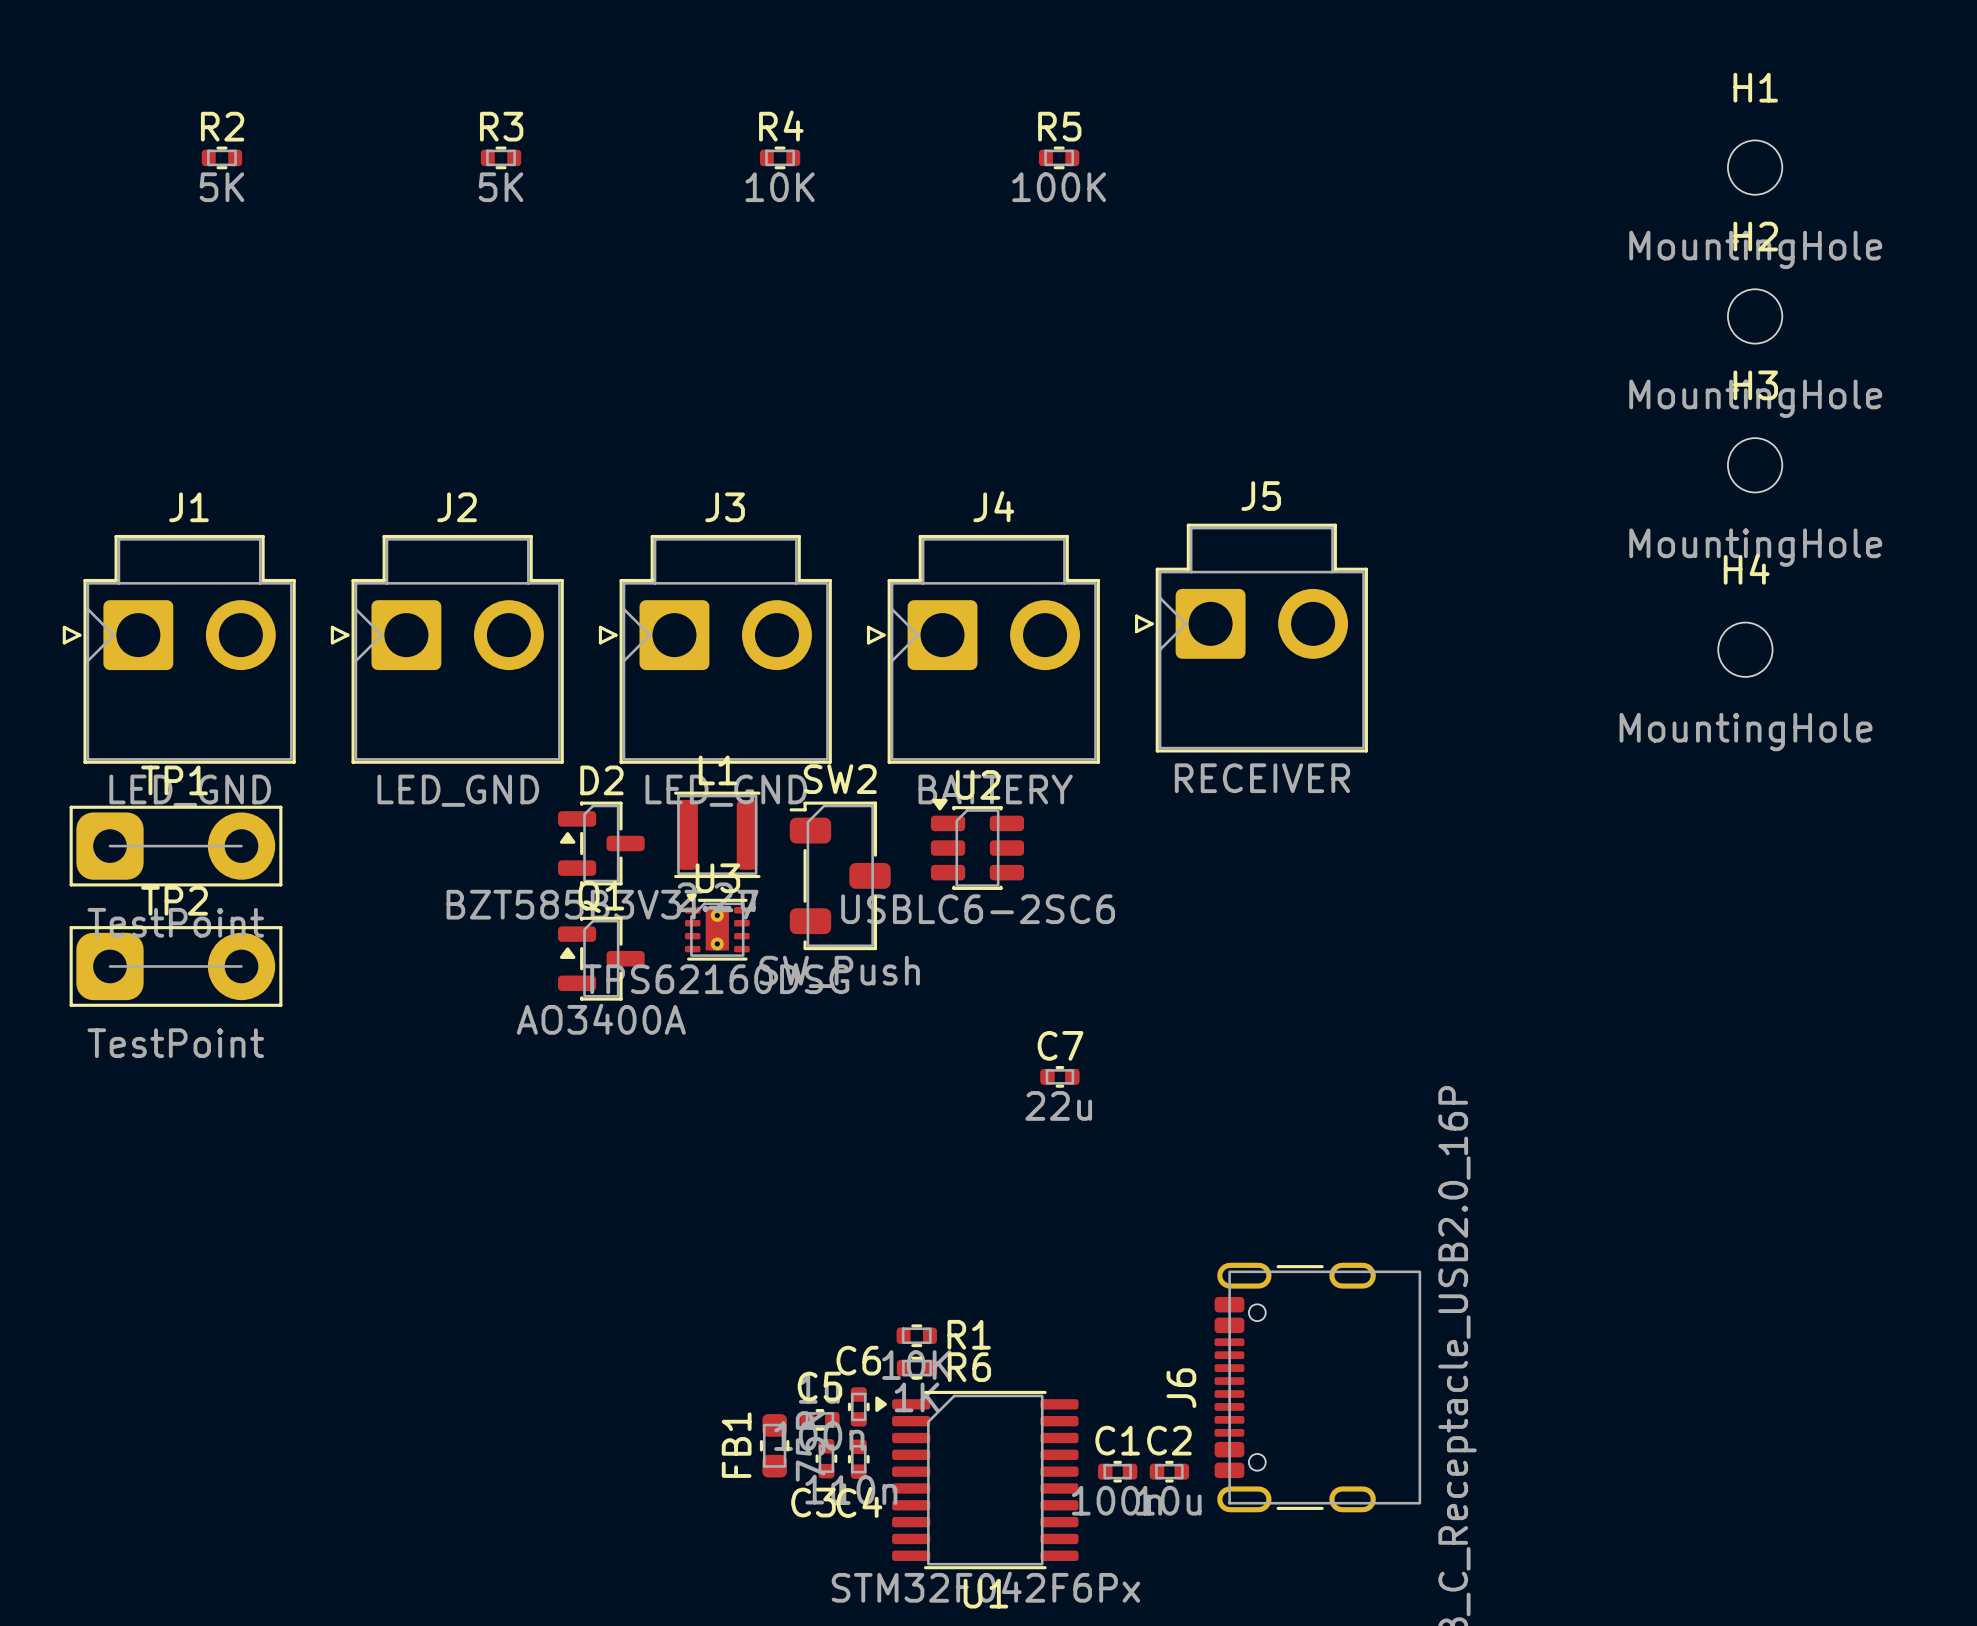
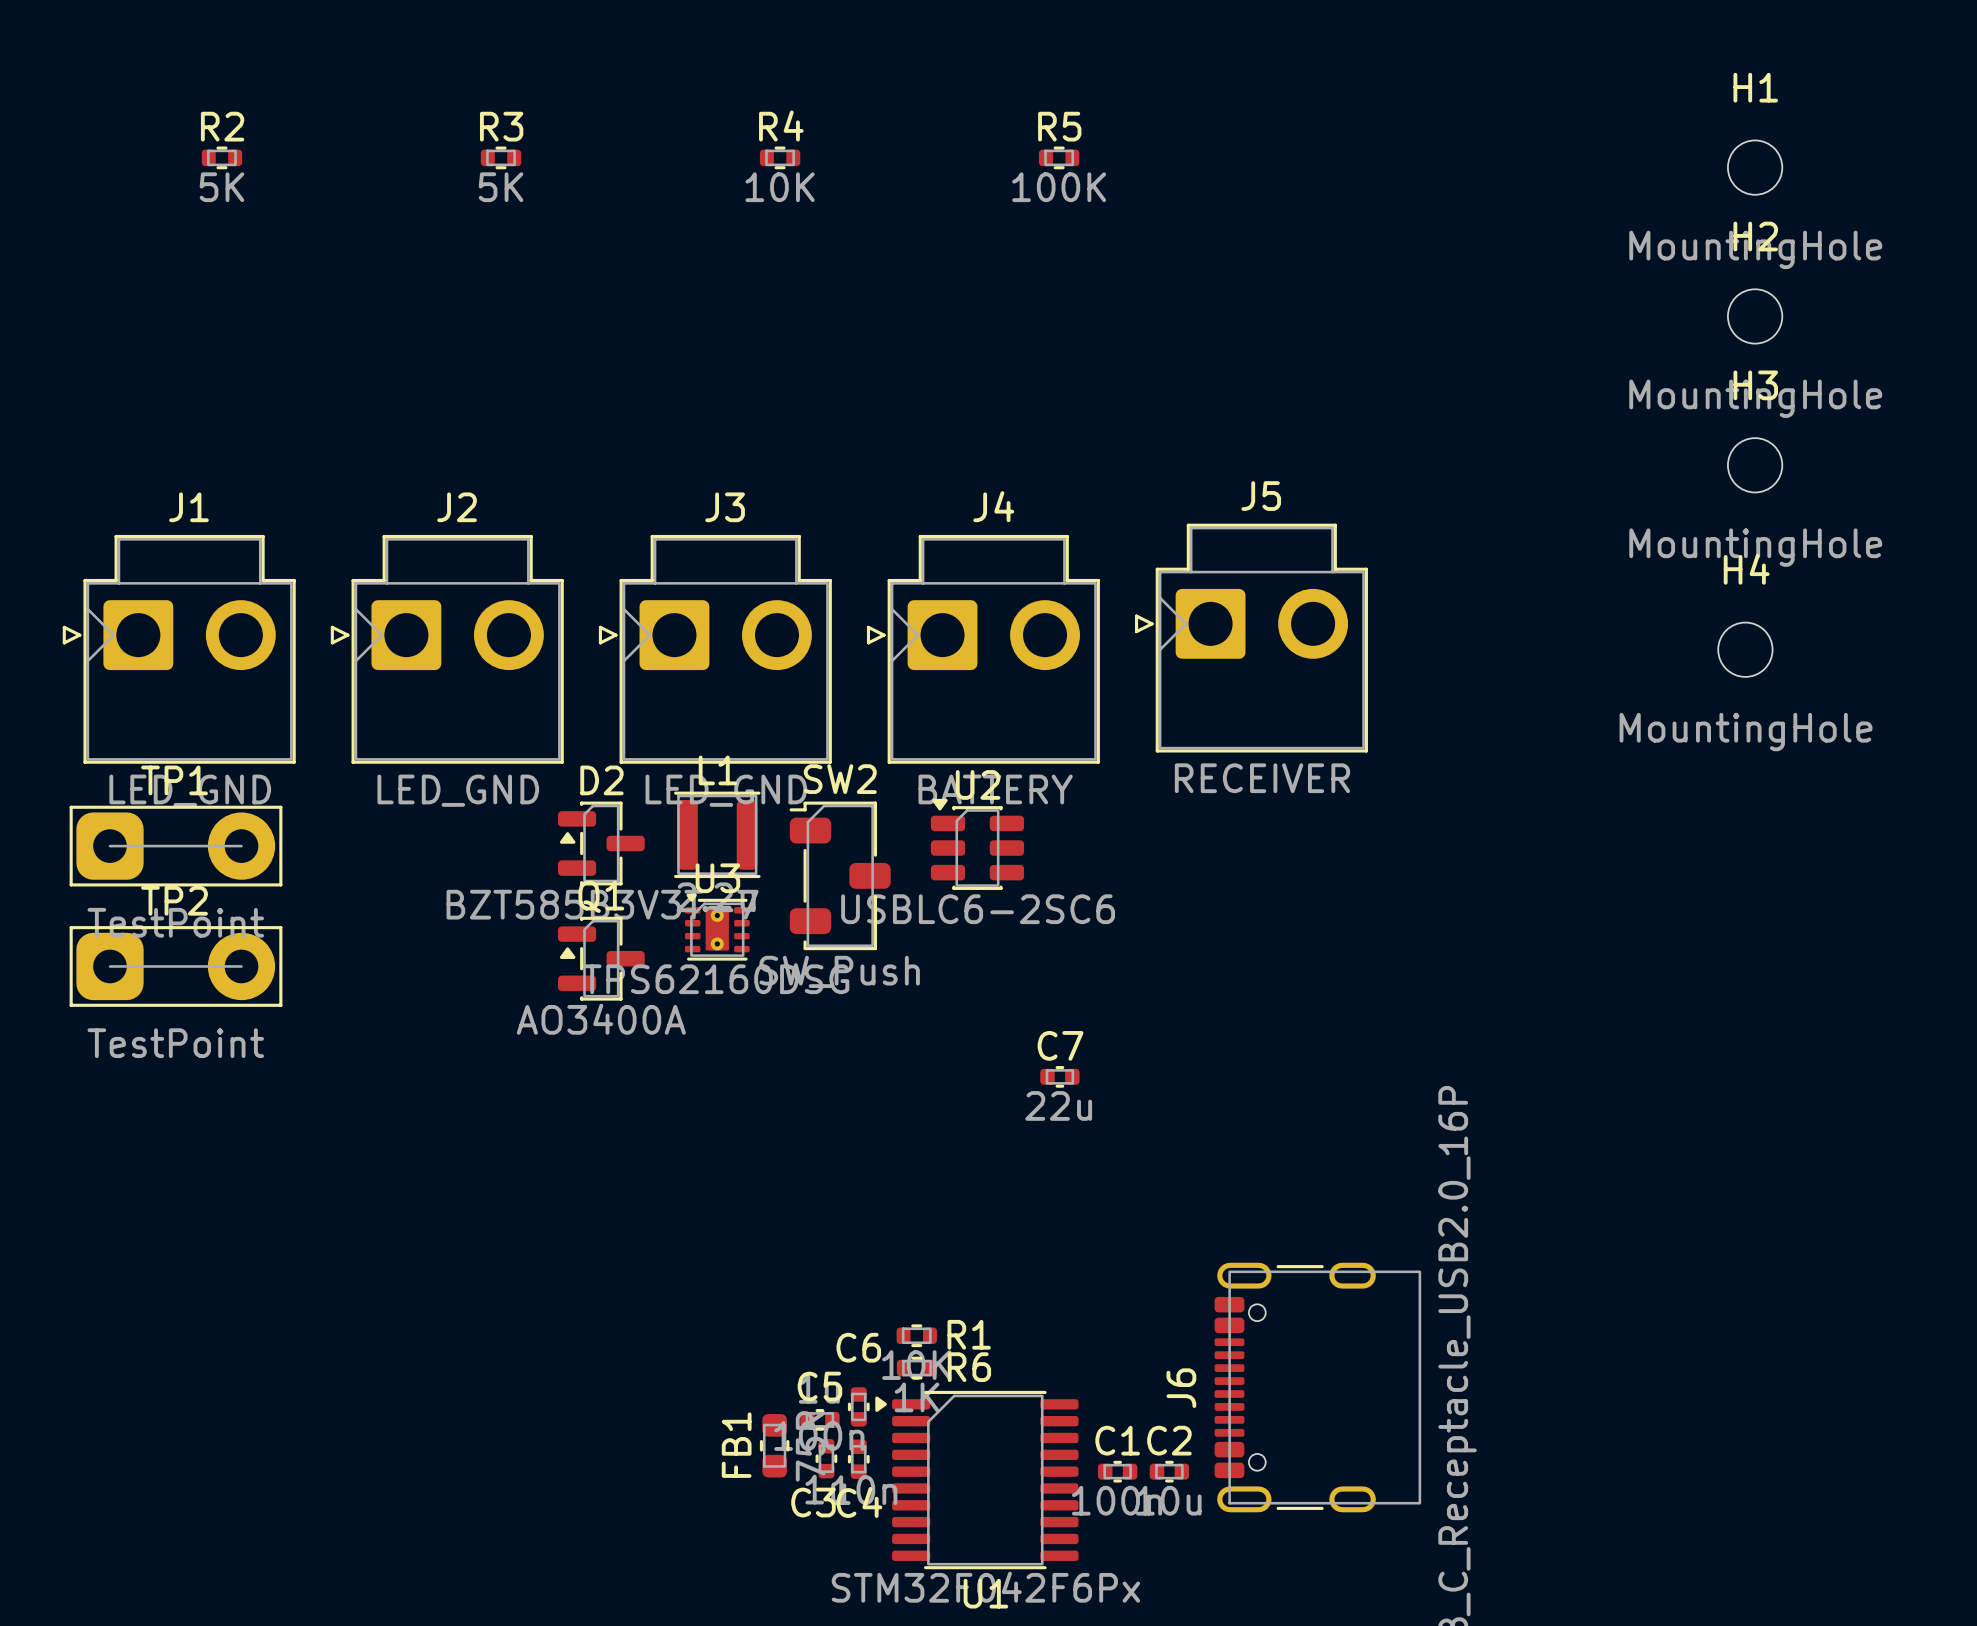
C6 name position: C6 (858, 1360) -> C6 (858, 1347)

